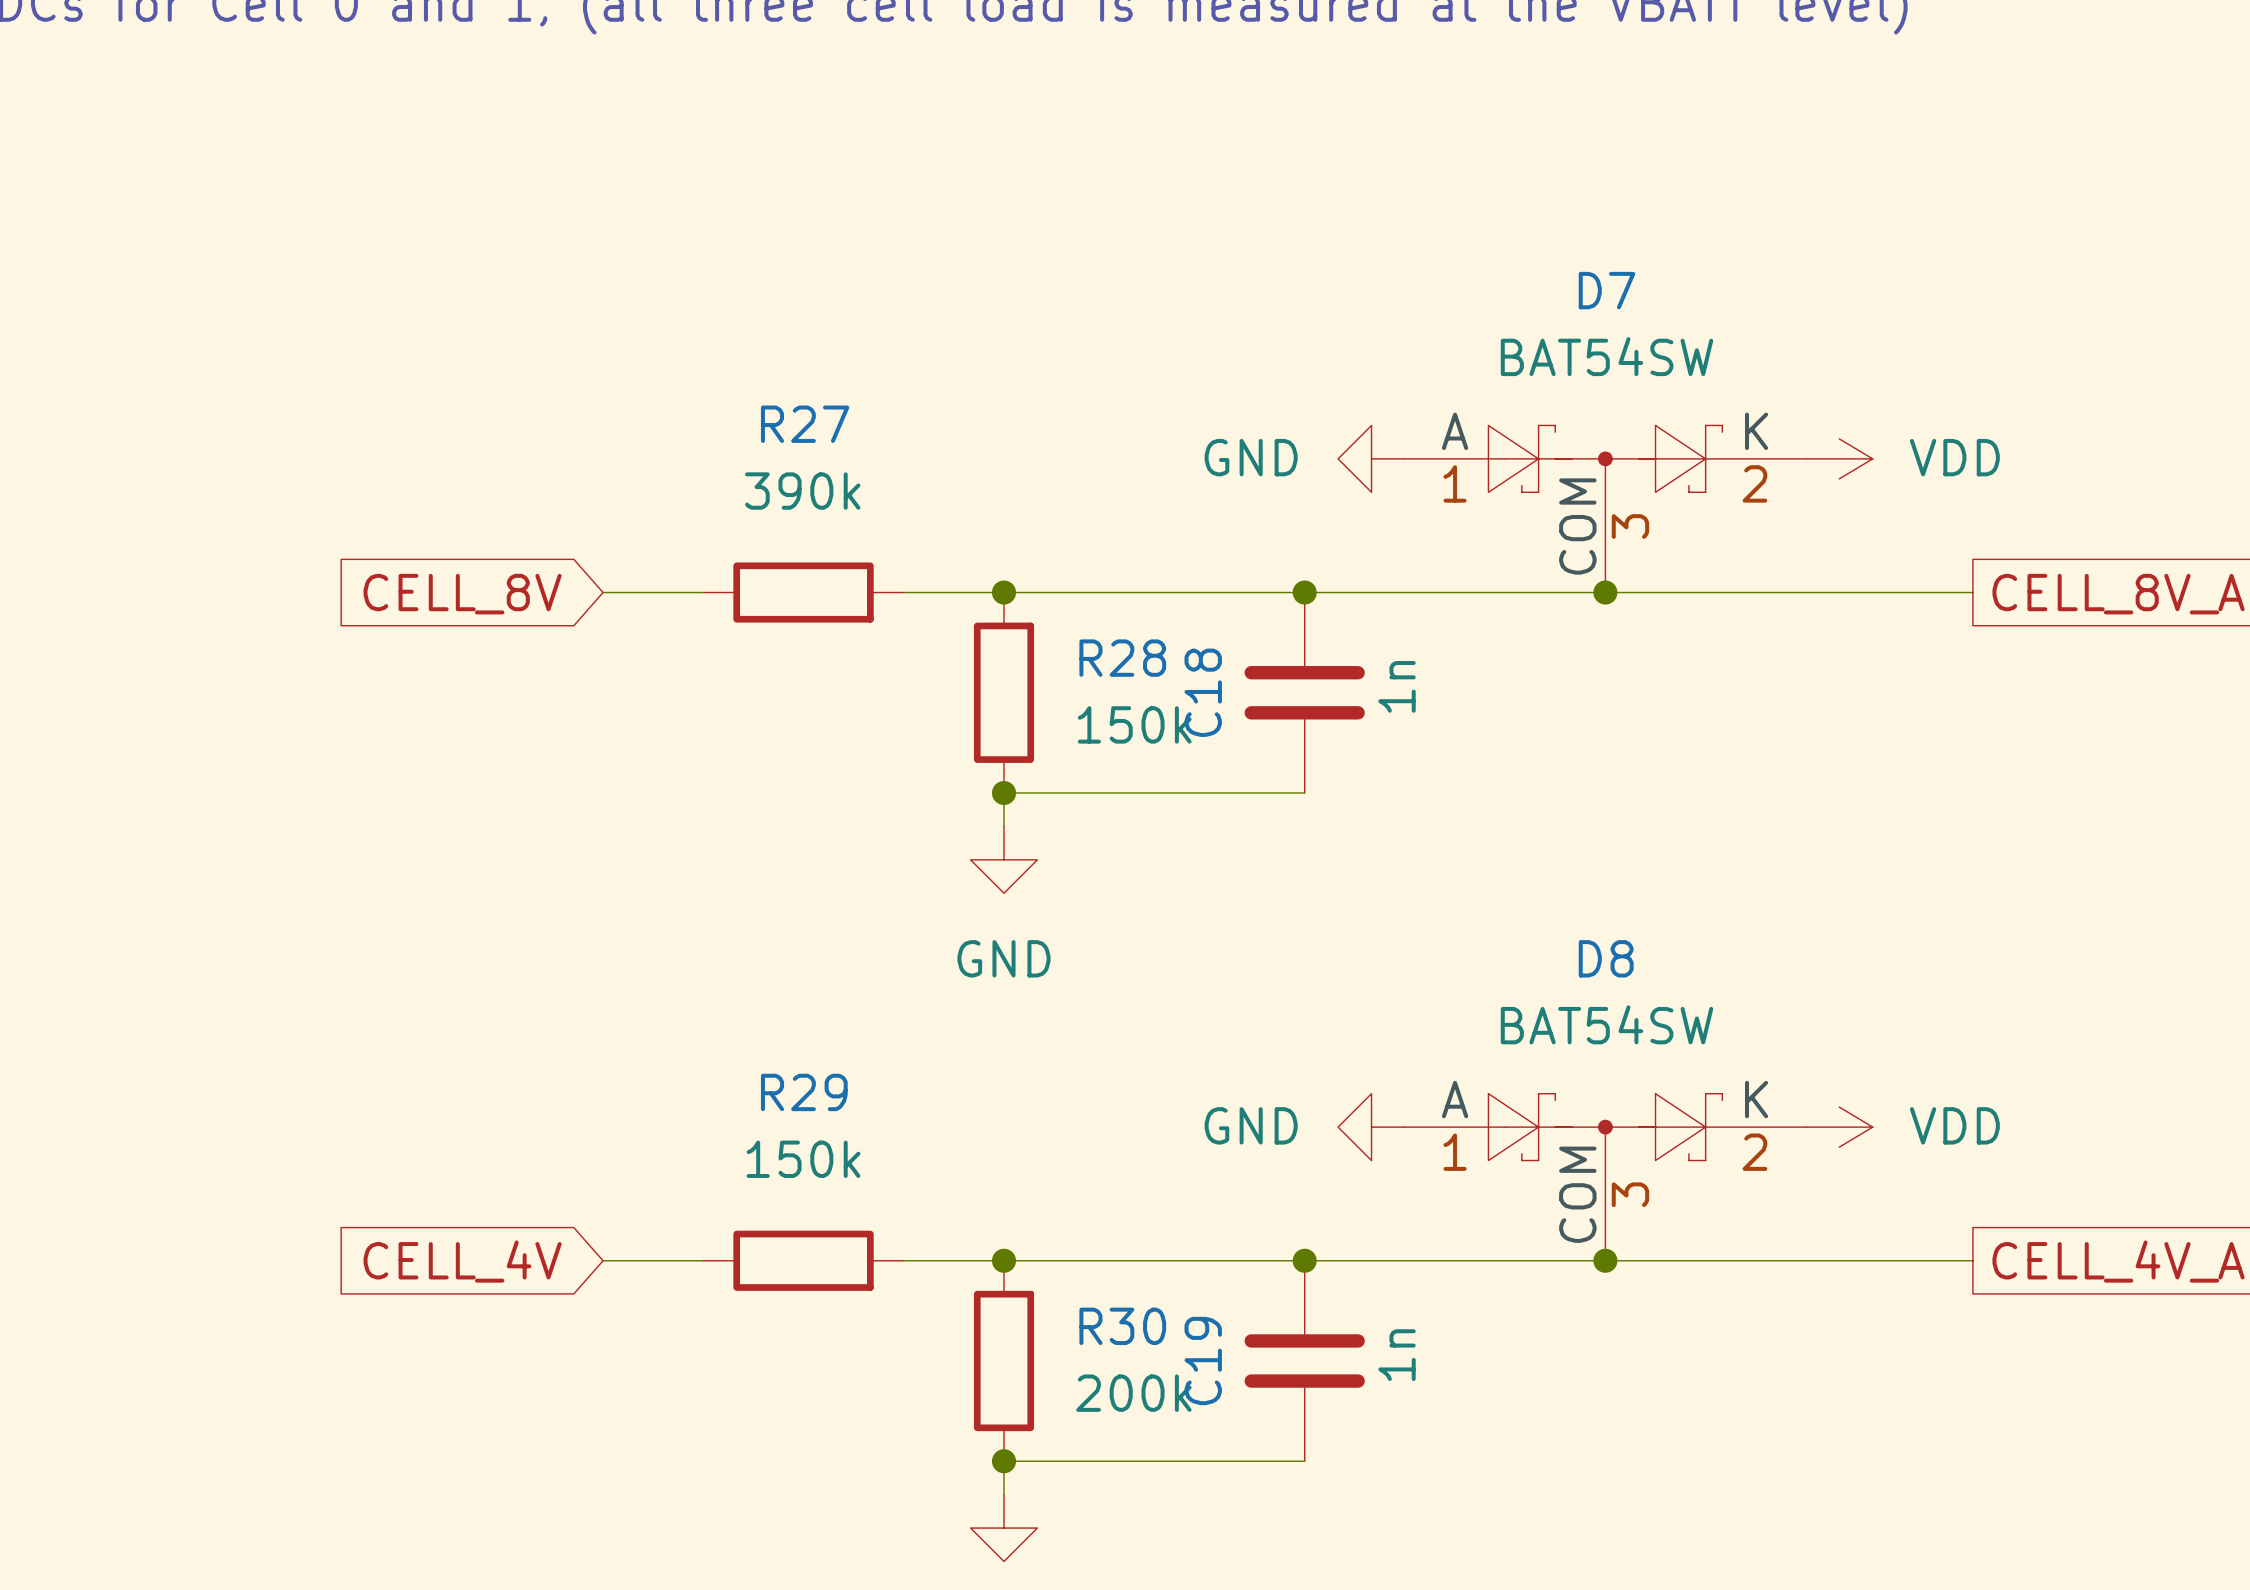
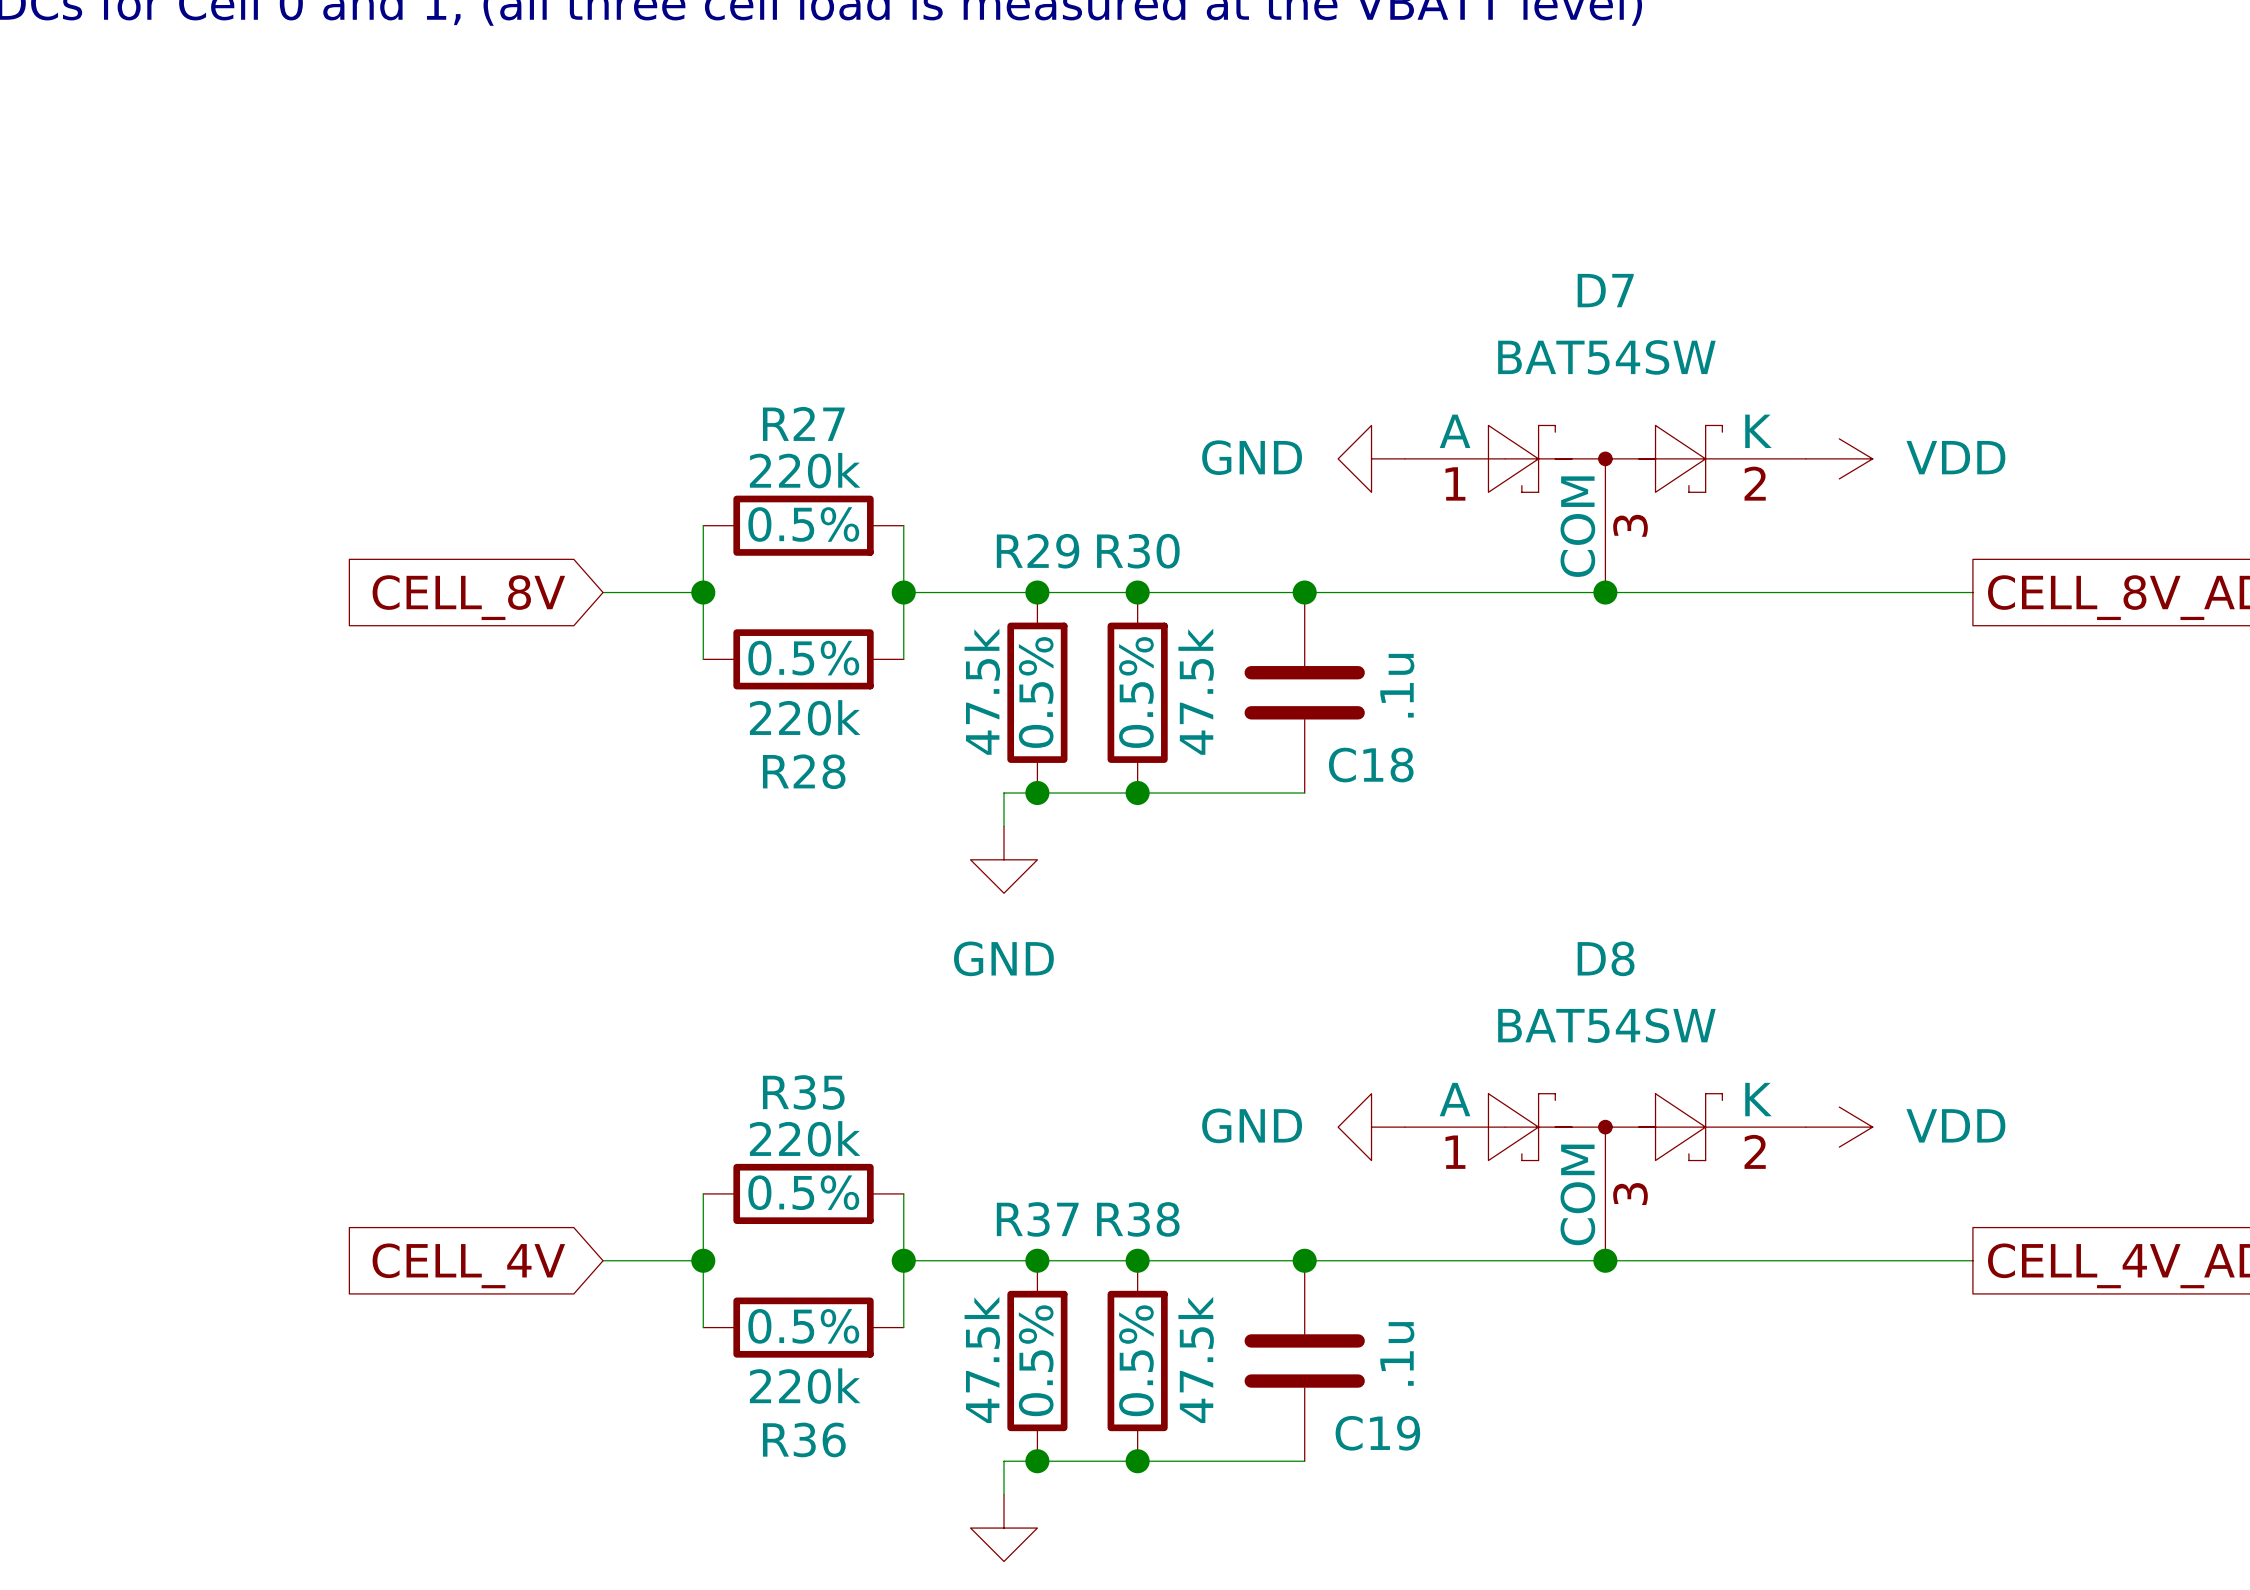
R27 value: 390k (802, 491) -> 220k (805, 470)
R27 text: none -> 0.5% (803, 524)
wire: none -> (703, 525) (703, 659)
wire: none -> (903, 525) (903, 659)
junction: none -> (703, 592)
R27 position: (803, 592) -> (803, 525)
junction: none -> (903, 592)
junction position: (1003, 592) -> (1037, 592)
junction: none -> (1137, 592)
R28 text: none -> 0.5% (803, 658)
C18 value: 1n (1397, 686) -> .1u (1397, 685)
R28 rotation: 0° (1003, 692) -> 90° clockwise (803, 659)
R28 position: (1003, 692) -> (803, 659)
R29 text: none -> 0.5% (1036, 692)
R30 text: none -> 0.5% (1136, 692)
C18 name rotation: 0° (1203, 692) -> 90° clockwise (1371, 765)
C18 name position: C18 (1203, 692) -> C18 (1371, 765)
R28 value: 150k (1134, 724) -> 220k (805, 717)
junction position: (1003, 793) -> (1037, 793)
junction: none -> (1137, 793)
R29 value: 150k (803, 1159) -> 47.5k (982, 691)
wire: none -> (703, 1193) (703, 1327)
R35: none -> 220k (803, 1193)
wire: none -> (903, 1193) (903, 1327)
junction: none -> (703, 1260)
R29 rotation: 0° (803, 1260) -> 90° clockwise (1037, 692)
R29 position: (803, 1260) -> (1037, 692)
junction: none -> (903, 1260)
junction position: (1003, 1260) -> (1037, 1260)
junction: none -> (1137, 1260)
R30 name position: R30 (1122, 1326) -> R30 (1138, 551)
R36: none -> 220k (803, 1327)
C19 value: 1n (1397, 1355) -> .1u (1397, 1353)
R30 position: (1003, 1361) -> (1137, 692)
R37: none -> 47.5k (1037, 1361)
R38: none -> 47.5k (1137, 1361)
C19 name rotation: 0° (1203, 1361) -> 90° clockwise (1377, 1433)
C19 name position: C19 (1203, 1361) -> C19 (1377, 1433)
R30 value: 200k (1133, 1393) -> 47.5k (1196, 691)
junction position: (1003, 1461) -> (1037, 1461)
junction: none -> (1137, 1461)

